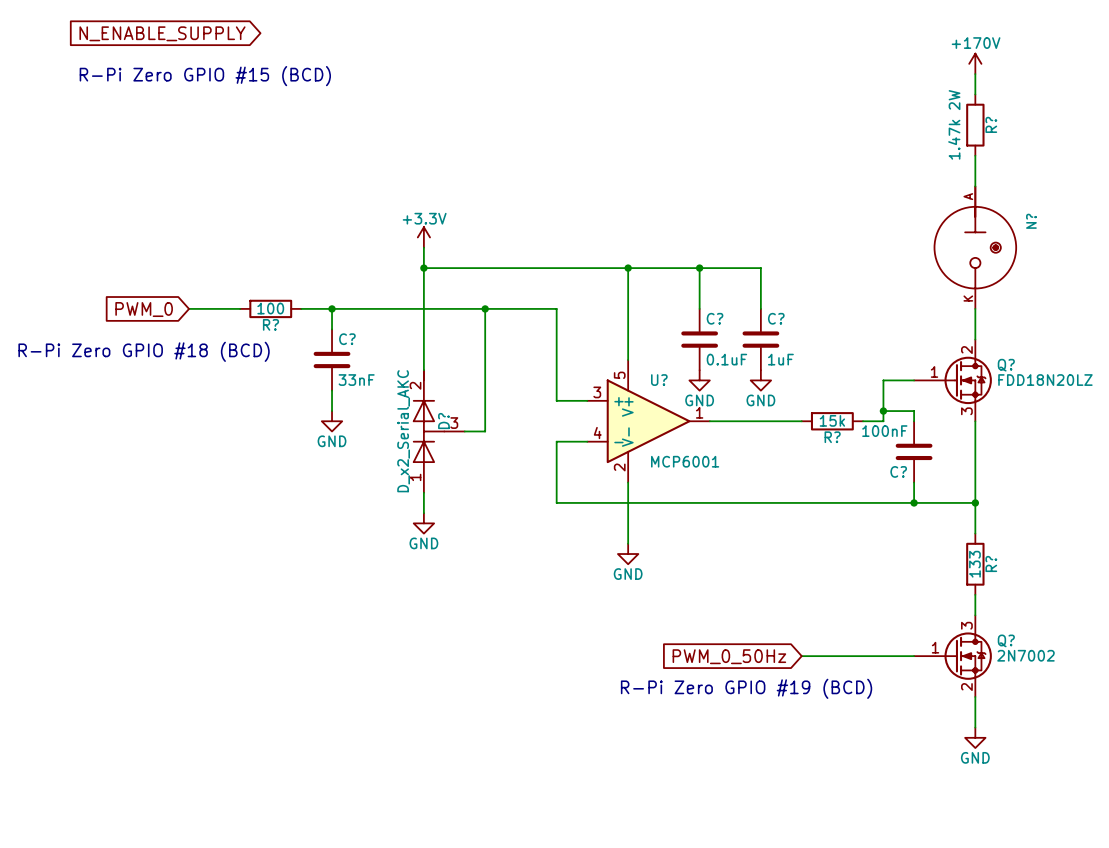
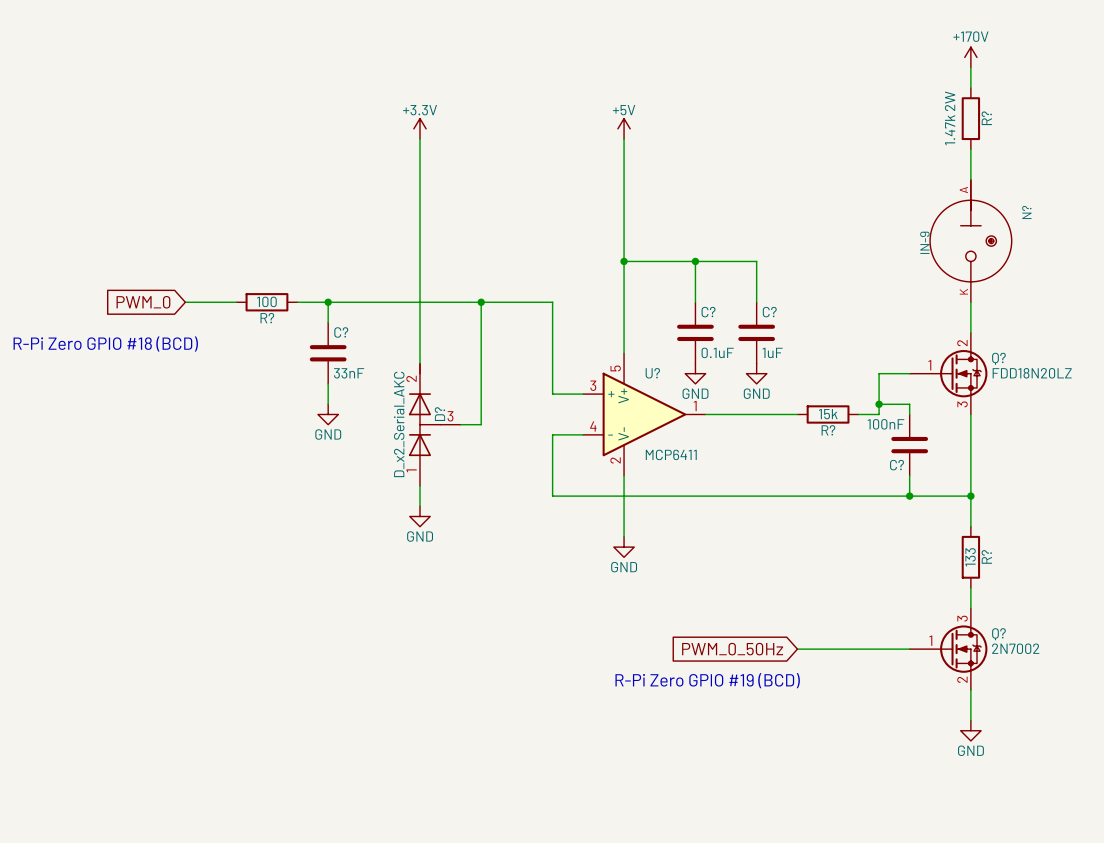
global label: N_ENABLE_SUPPLY (162, 33) -> none
text: R-Pi Zero GPIO #15 (BCD) (205, 76) -> none
power symbol: none -> +5V (624, 128)
wire: none -> (419, 139) (419, 241)
power symbol position: +3.3V (423, 237) -> +3.3V (419, 128)
N? value: none -> IN-9 (924, 242)
wire: (423, 268) (628, 268) -> (624, 139) (624, 261)
junction: (423, 268) -> none
U? value: MCP6001 (685, 461) -> MCP6411 (671, 454)

